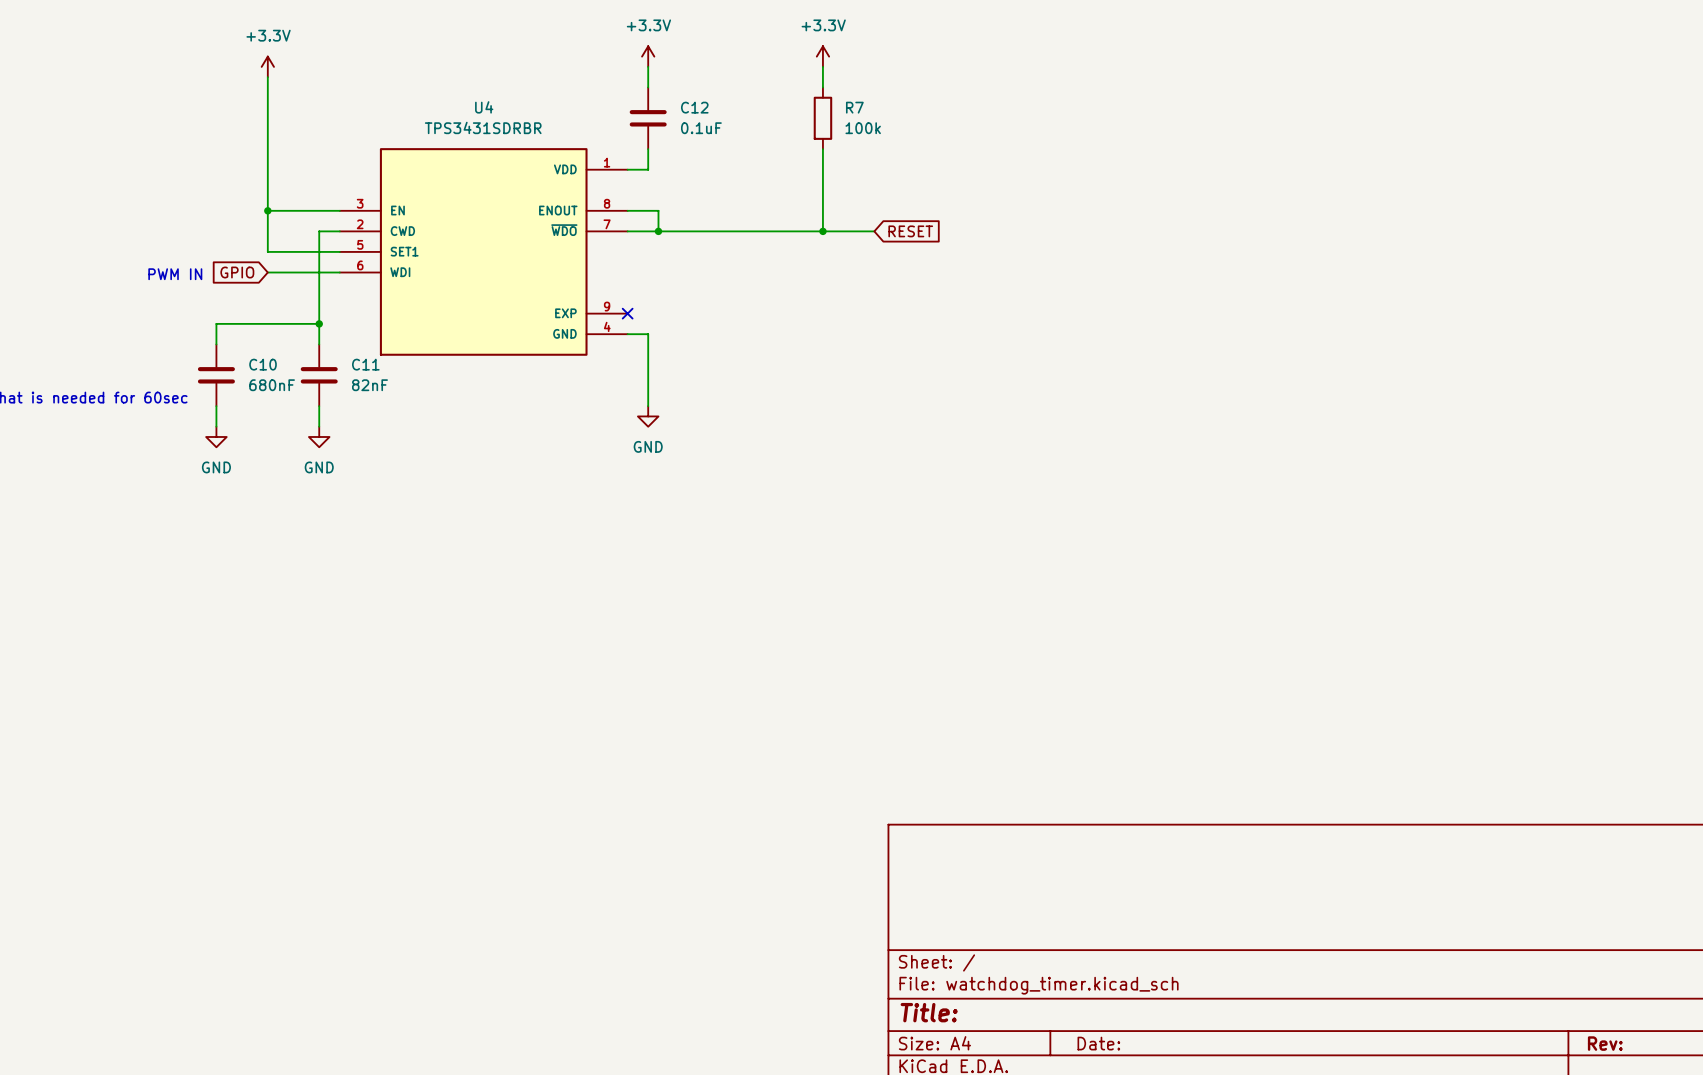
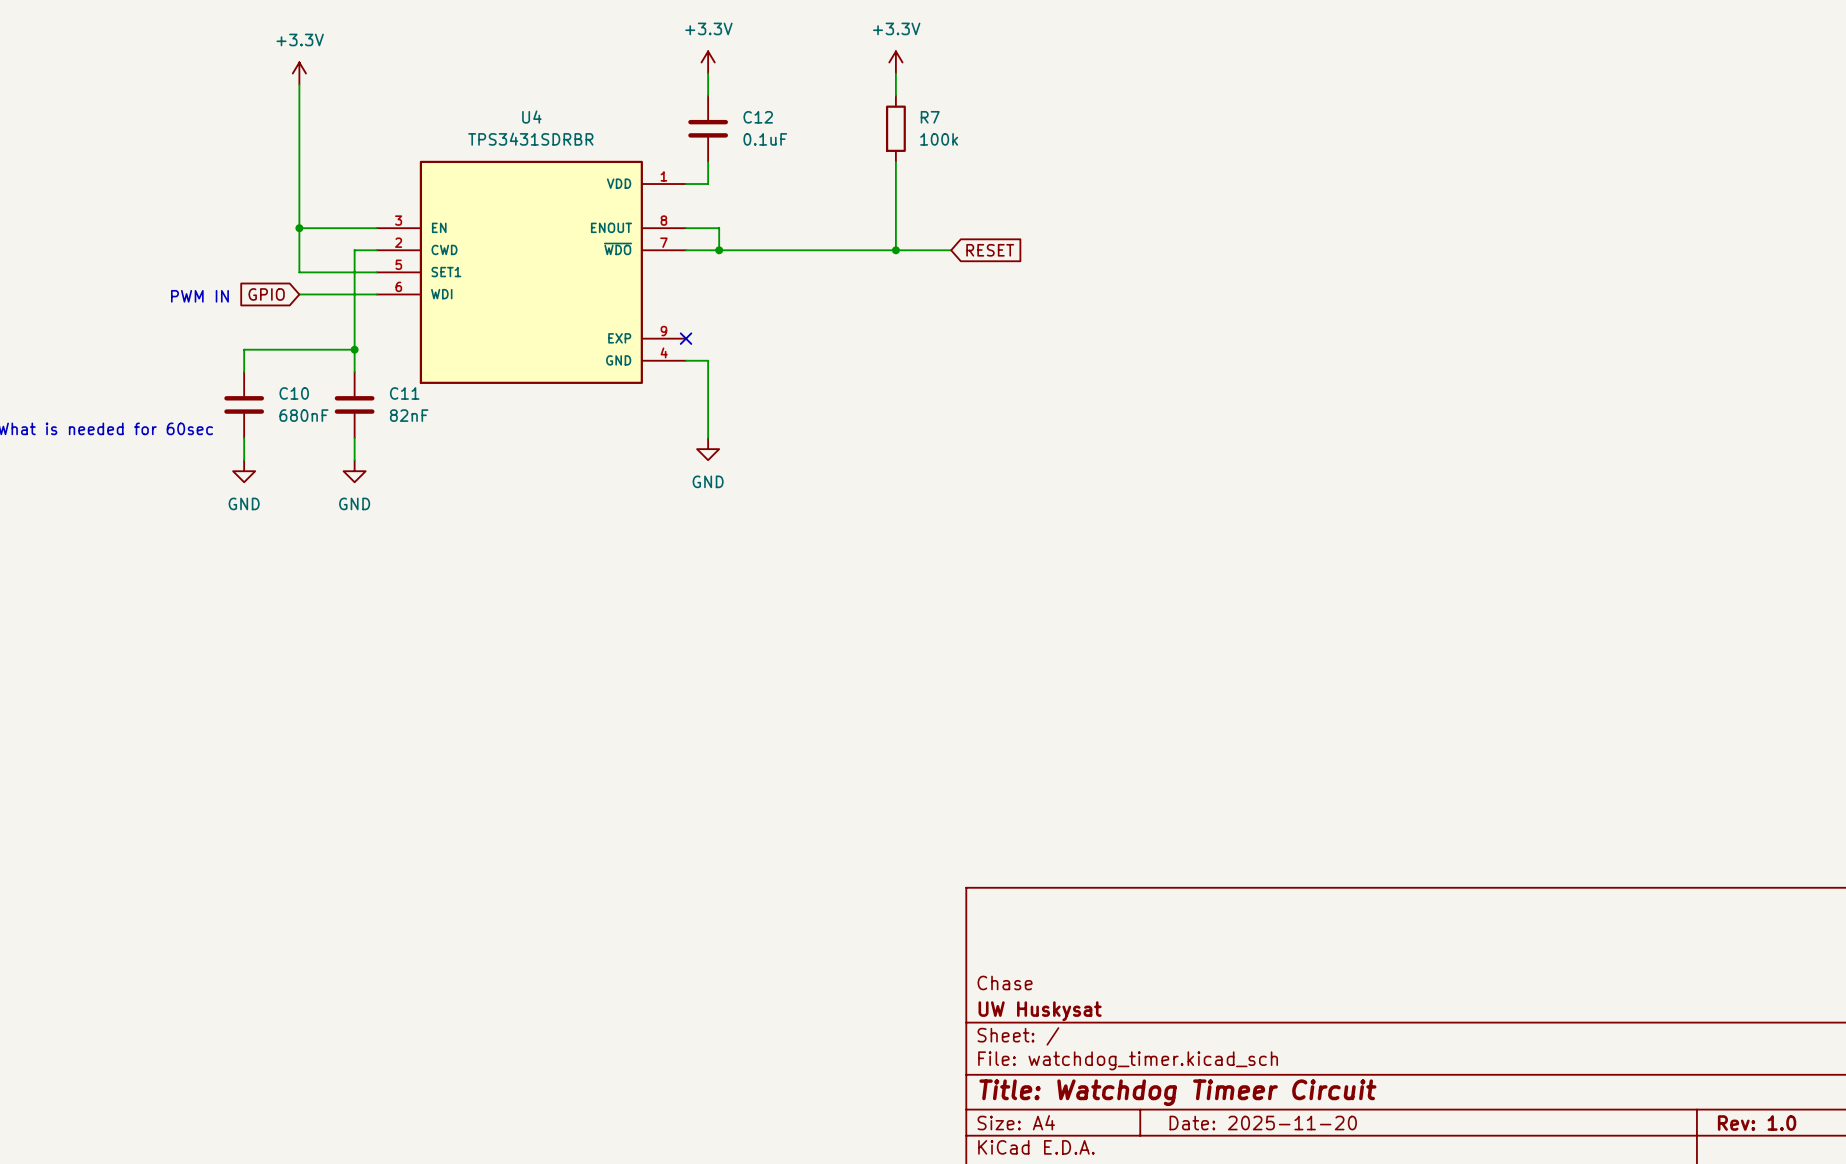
title block: none -> Chase (1005, 982)
title block: none -> UW Huskysat (1040, 1011)
title block: Title: (929, 1012) -> Title: Watchdog Timeer Circuit (1177, 1092)
title block: Date: (1098, 1043) -> Date: 2025-11-20 (1263, 1123)
title block: Rev: (1605, 1043) -> Rev: 1.0 (1757, 1123)

